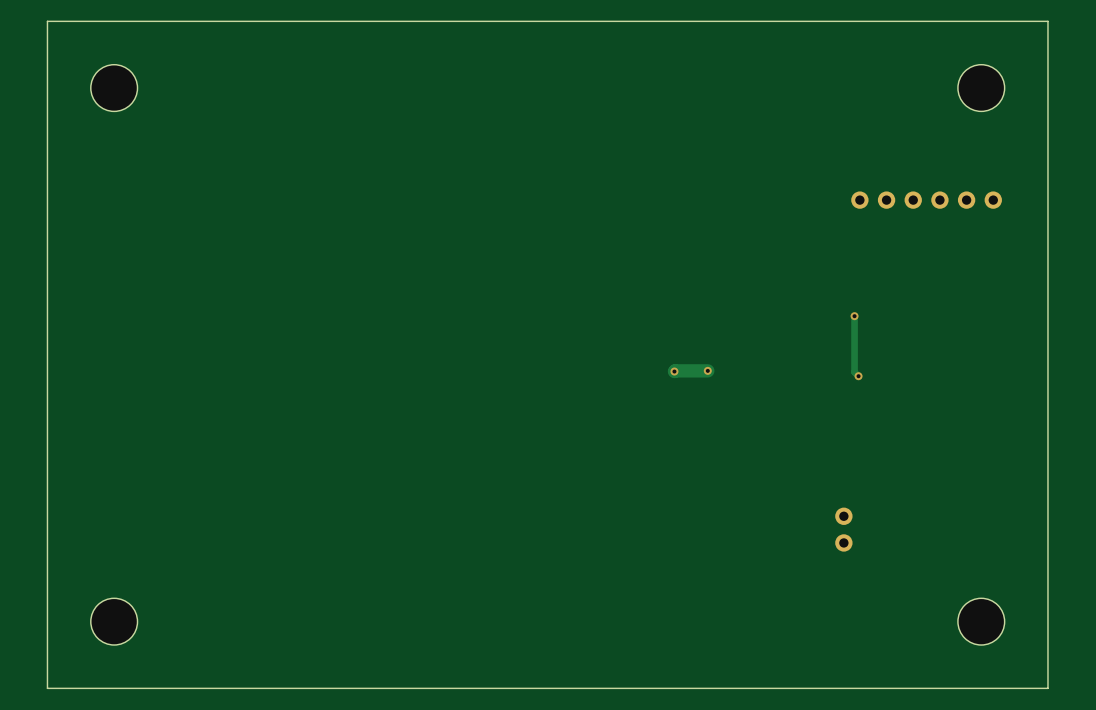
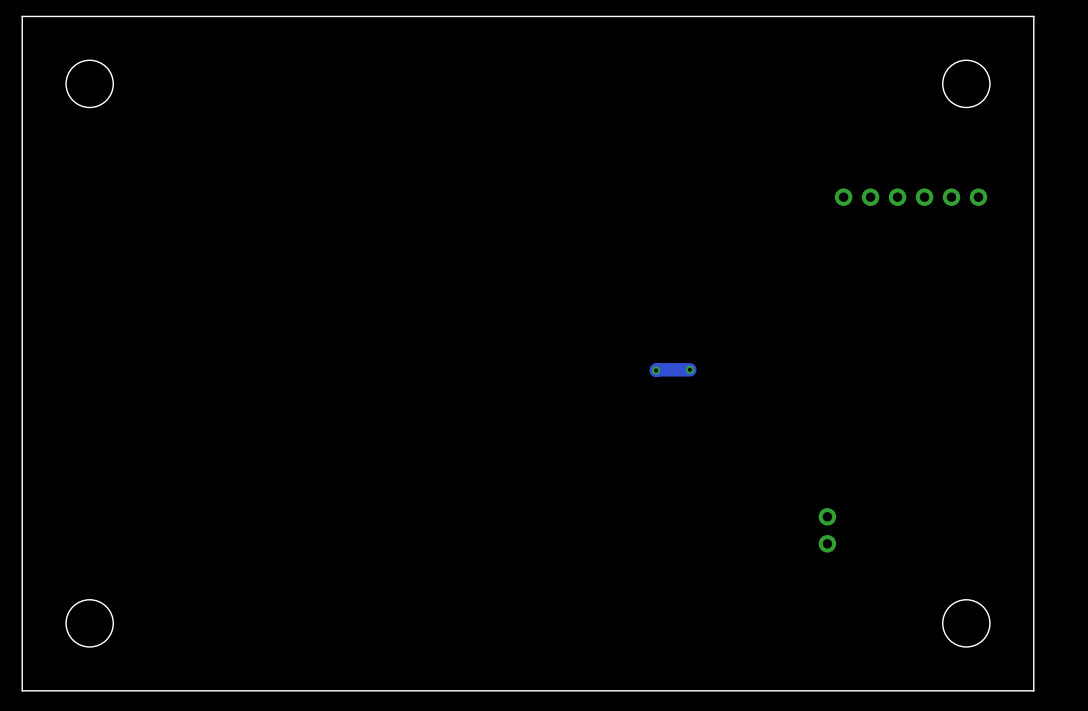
track: (854, 316) (854, 372) (858, 376) -> none
via: (854, 316) -> none
via: (858, 376) -> none

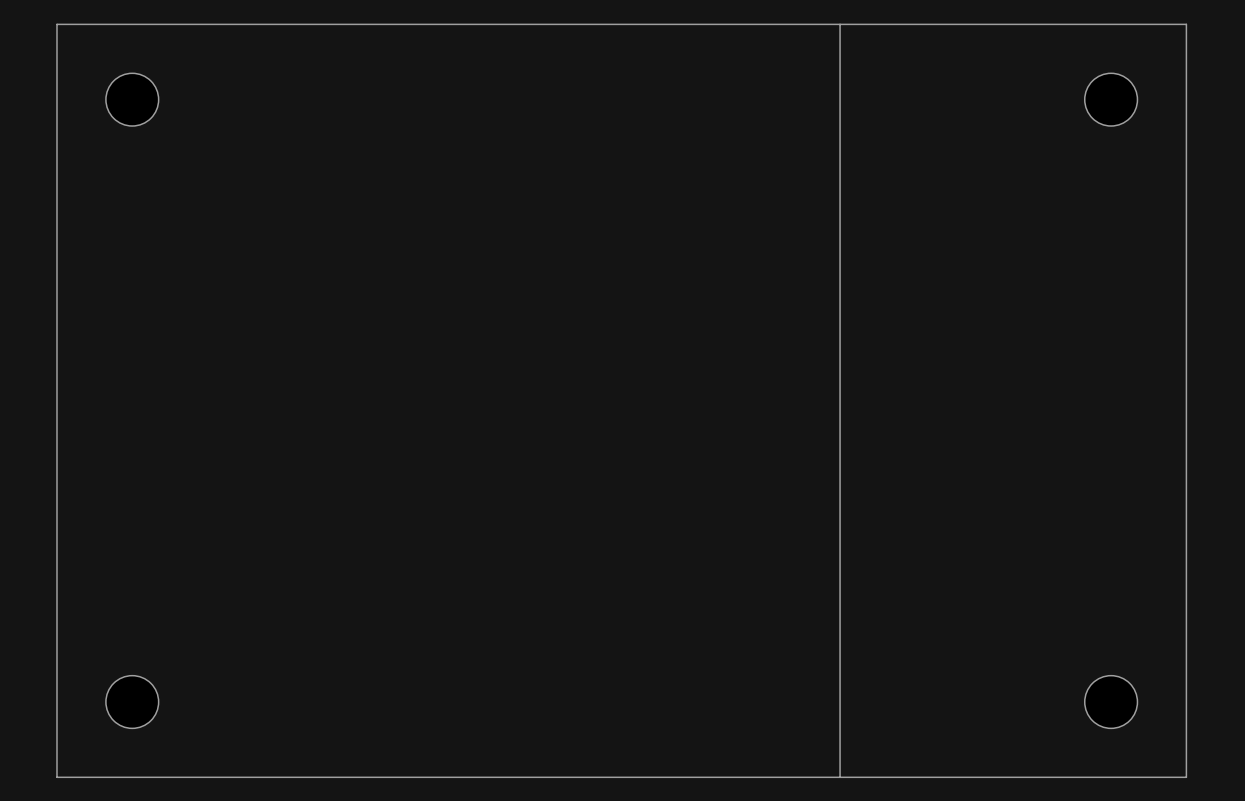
board edge: none -> (840, 24) (840, 777)
part: (911, 197) -> none
track: (689, 369) (656, 370) -> none
via: (689, 369) -> none
via: (656, 370) -> none
part: (827, 530) -> none

